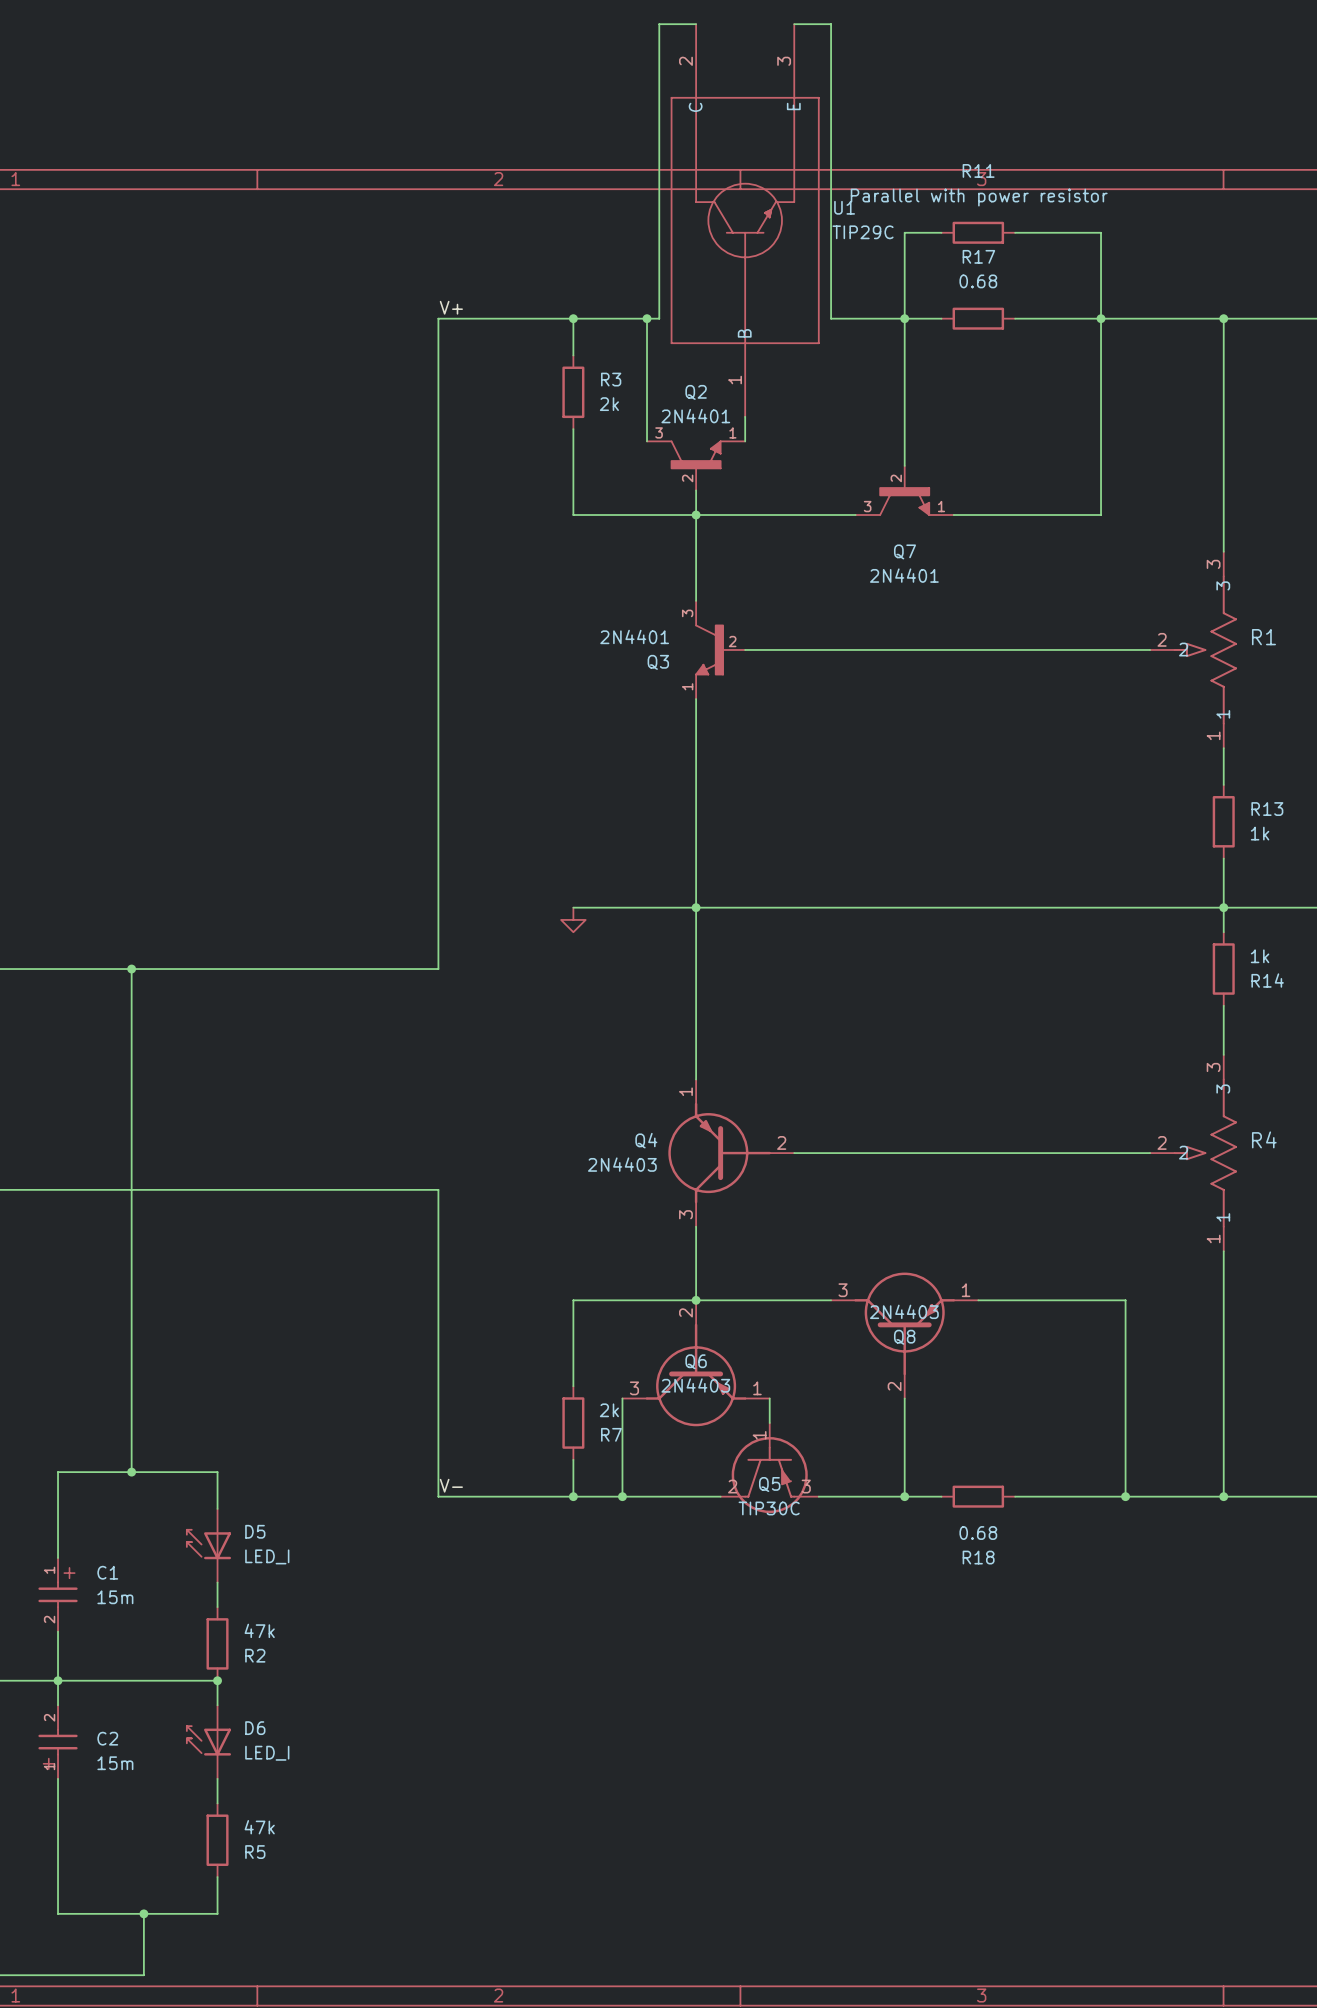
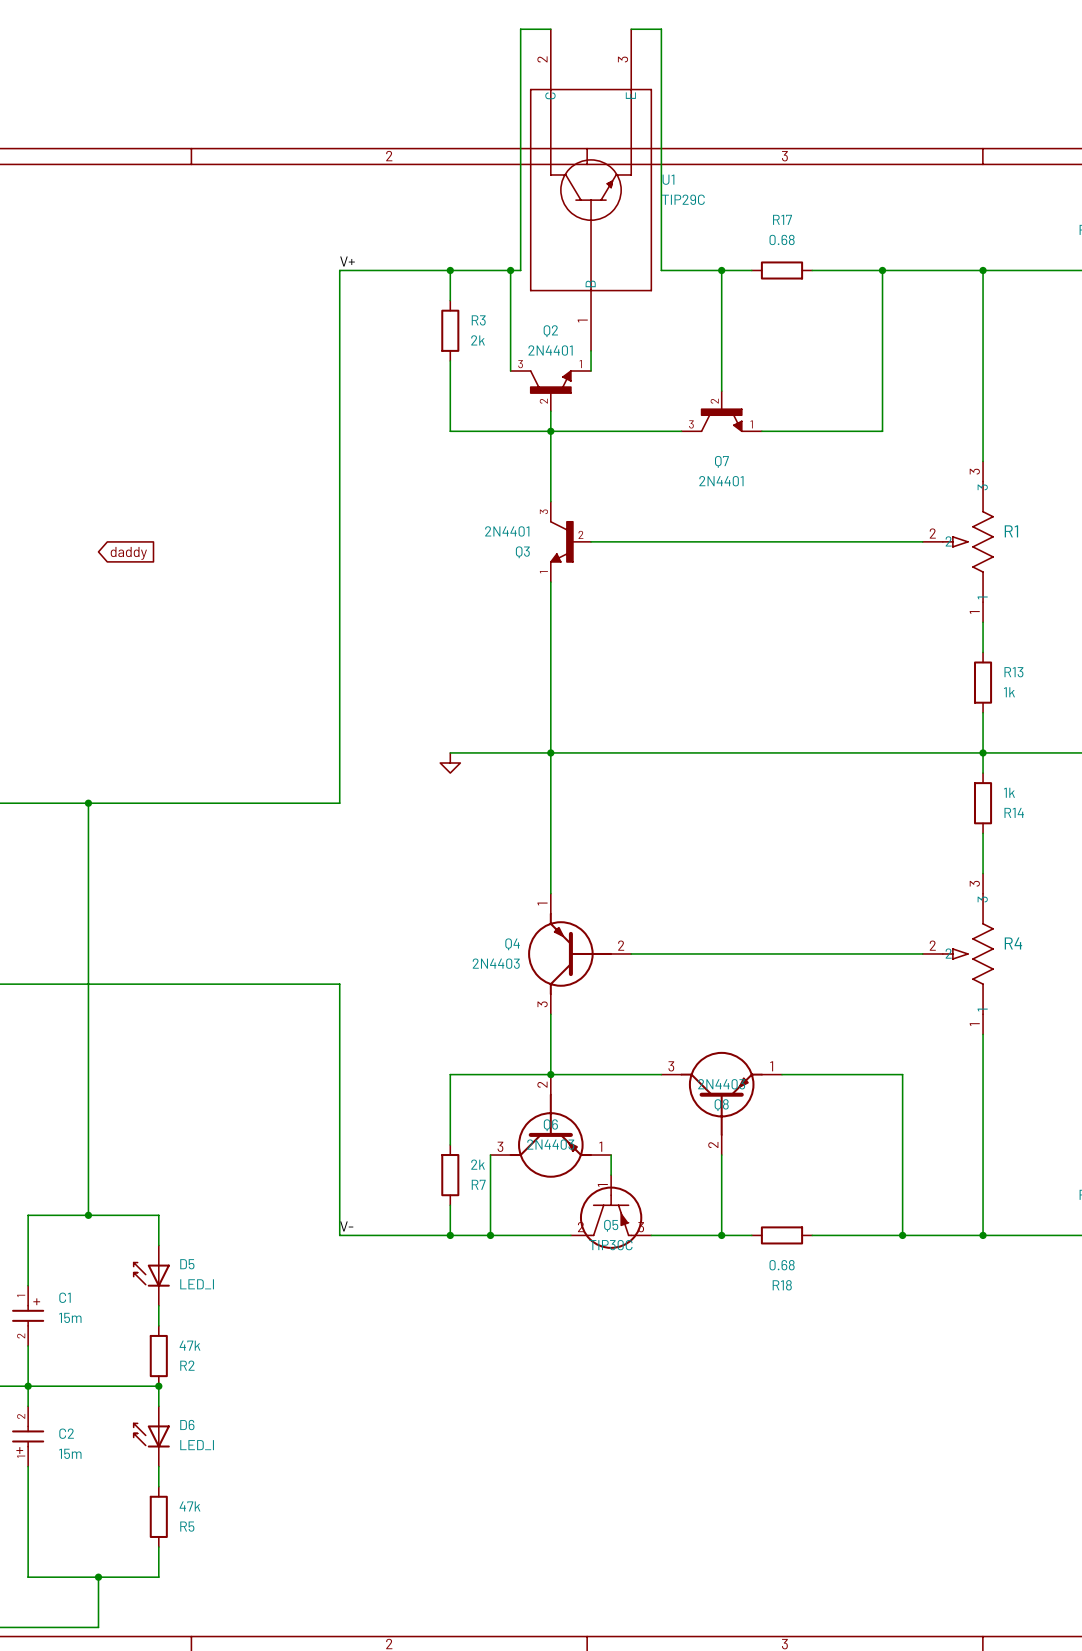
wire: (941, 232) (904, 232) (904, 318) -> none
R11: Parallel with power resistor (978, 232) -> none
wire: (1015, 232) (1101, 232) (1101, 318) -> none
global label: none -> daddy (128, 553)

